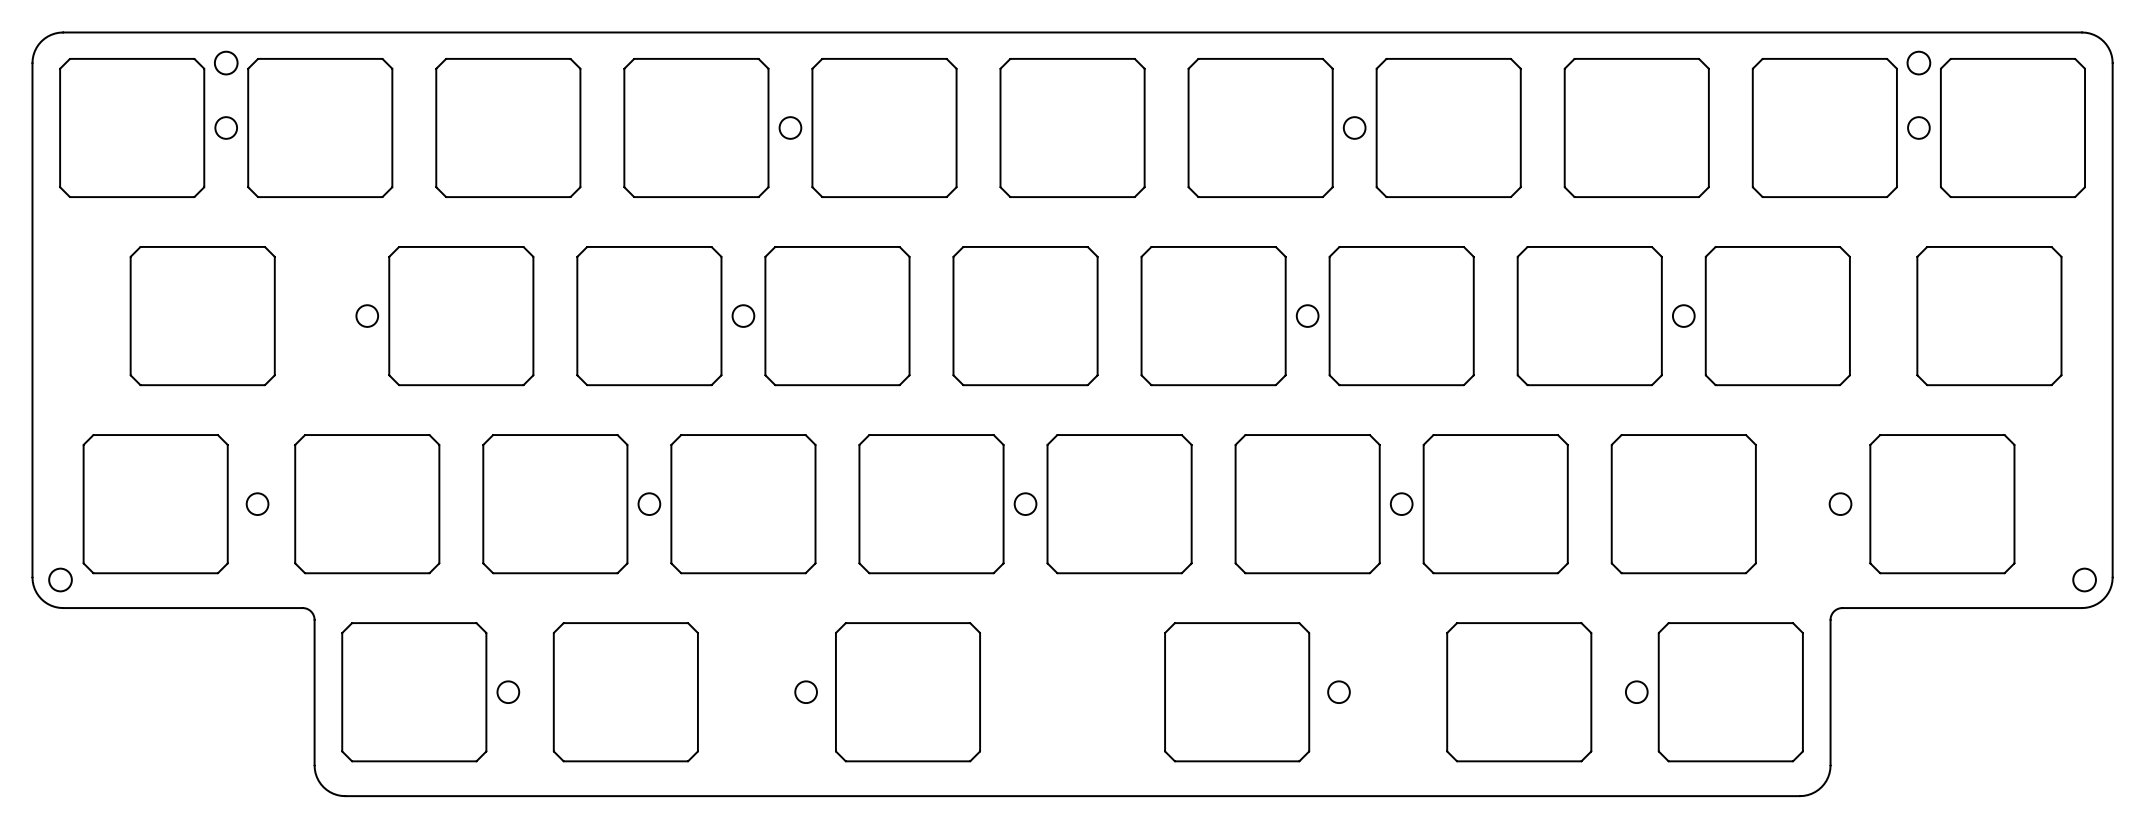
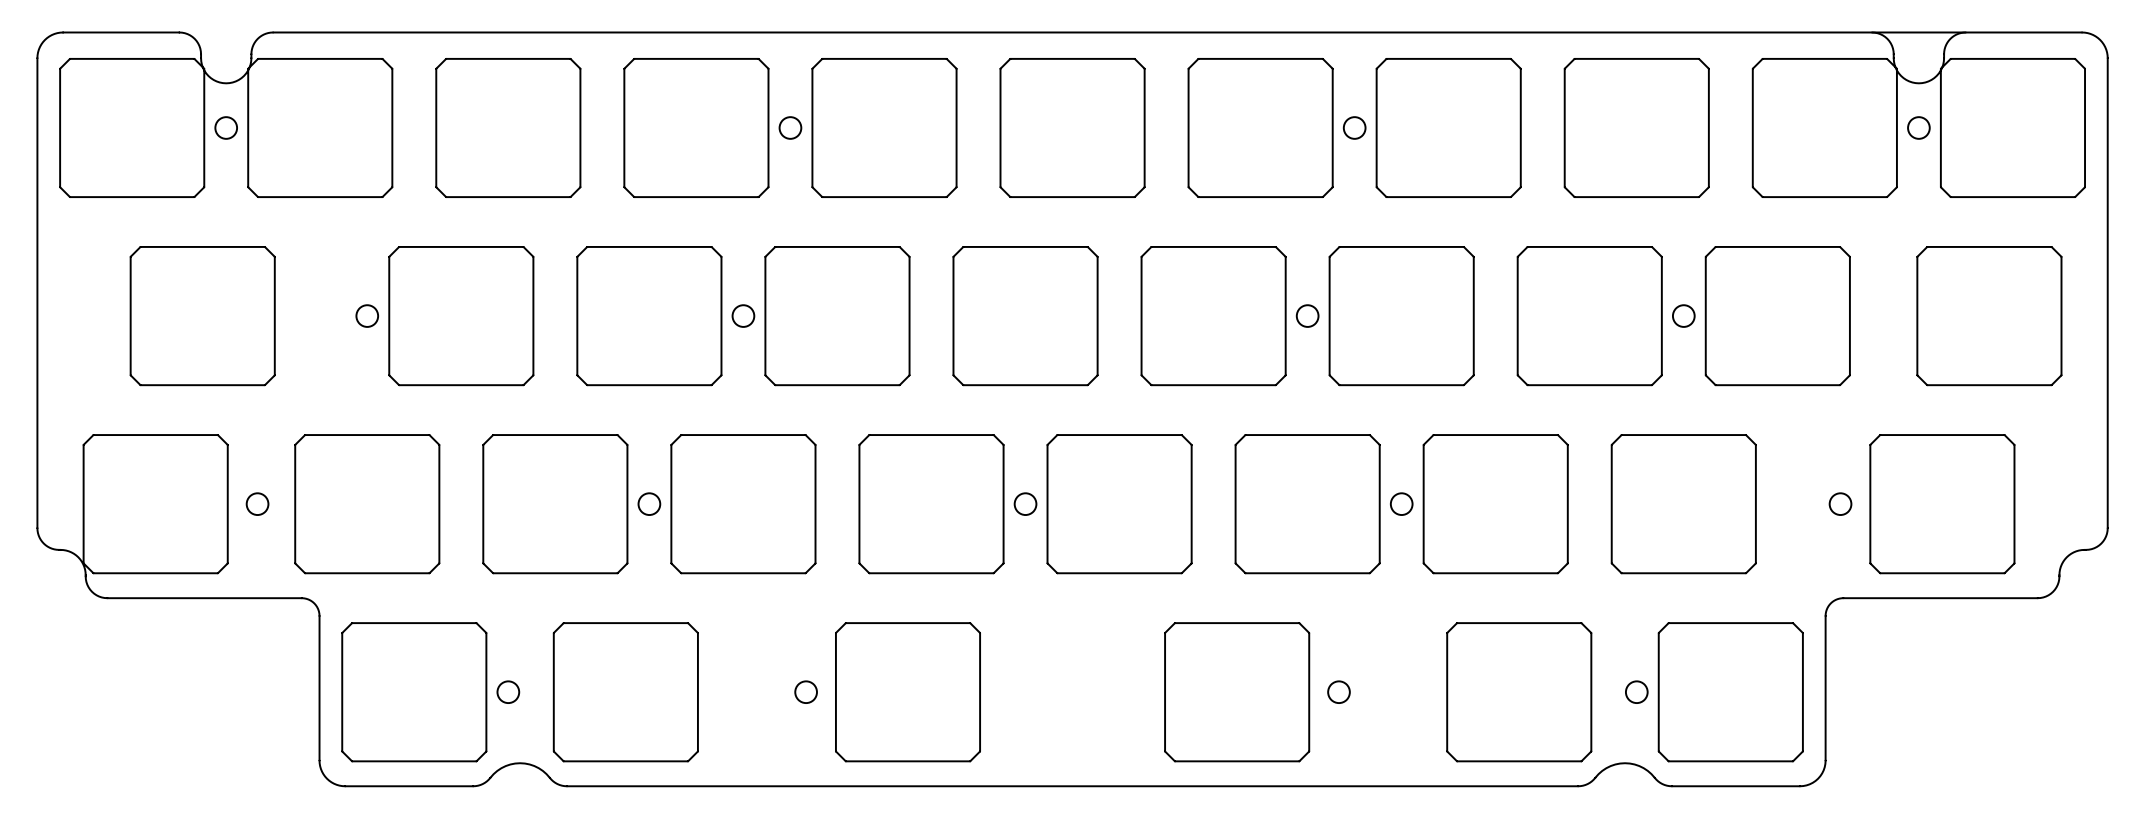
board edge: none -> (1872, 32) (1880, 34) (1889, 40) (1892, 48) (1894, 64) (1901, 75) (1909, 81) (1918, 83) (1928, 81) (1936, 75) (1943, 64) (1947, 42) (1954, 35) (1965, 32)
board edge: (2082, 32) (2093, 34) (2103, 41) (2110, 51) (2112, 63) (2112, 577) (2110, 589) (2100, 601) (2086, 607) (1842, 608) (1836, 609) (1832, 613) (1830, 619) (1830, 769) (1826, 780) (1818, 789) (1807, 795) (1799, 796) (345, 796) (329, 792) (320, 784) (314, 769) (314, 619) (309, 610) (302, 608) (59, 607) (51, 605) (41, 599) (36, 592) (32, 581) (32, 63) (34, 51) (44, 38) (59, 32) (273, 32) -> (2082, 32) (2090, 33) (2100, 40) (2105, 47) (2107, 58) (2107, 528) (2106, 536) (2096, 546) (2076, 551) (2066, 557) (2060, 566) (2056, 587) (2050, 593) (2043, 597) (1843, 598) (1832, 602) (1827, 608) (1825, 615) (1825, 763) (1822, 773) (1815, 780) (1799, 786) (1669, 786) (1660, 782) (1643, 768) (1625, 763) (1606, 768) (1589, 782) (1578, 786) (566, 786) (555, 782) (538, 768) (520, 763) (501, 768) (484, 782) (475, 786) (345, 786) (334, 783) (325, 776) (319, 763) (319, 615) (318, 609) (312, 601) (301, 598) (101, 597) (94, 593) (88, 587) (84, 566) (78, 557) (68, 551) (47, 546) (40, 539) (37, 530) (37, 58) (39, 47) (47, 38) (60, 32) (182, 32) (192, 36) (198, 43) (201, 64) (206, 73) (216, 81) (226, 83) (235, 81) (244, 75) (250, 64) (254, 42) (263, 34) (273, 32)
round board edge: [213, 50, 239, 76] -> none
round board edge: [1906, 50, 1932, 76] -> none
round board edge: [48, 567, 73, 593] -> none
round board edge: [2072, 567, 2097, 593] -> none

